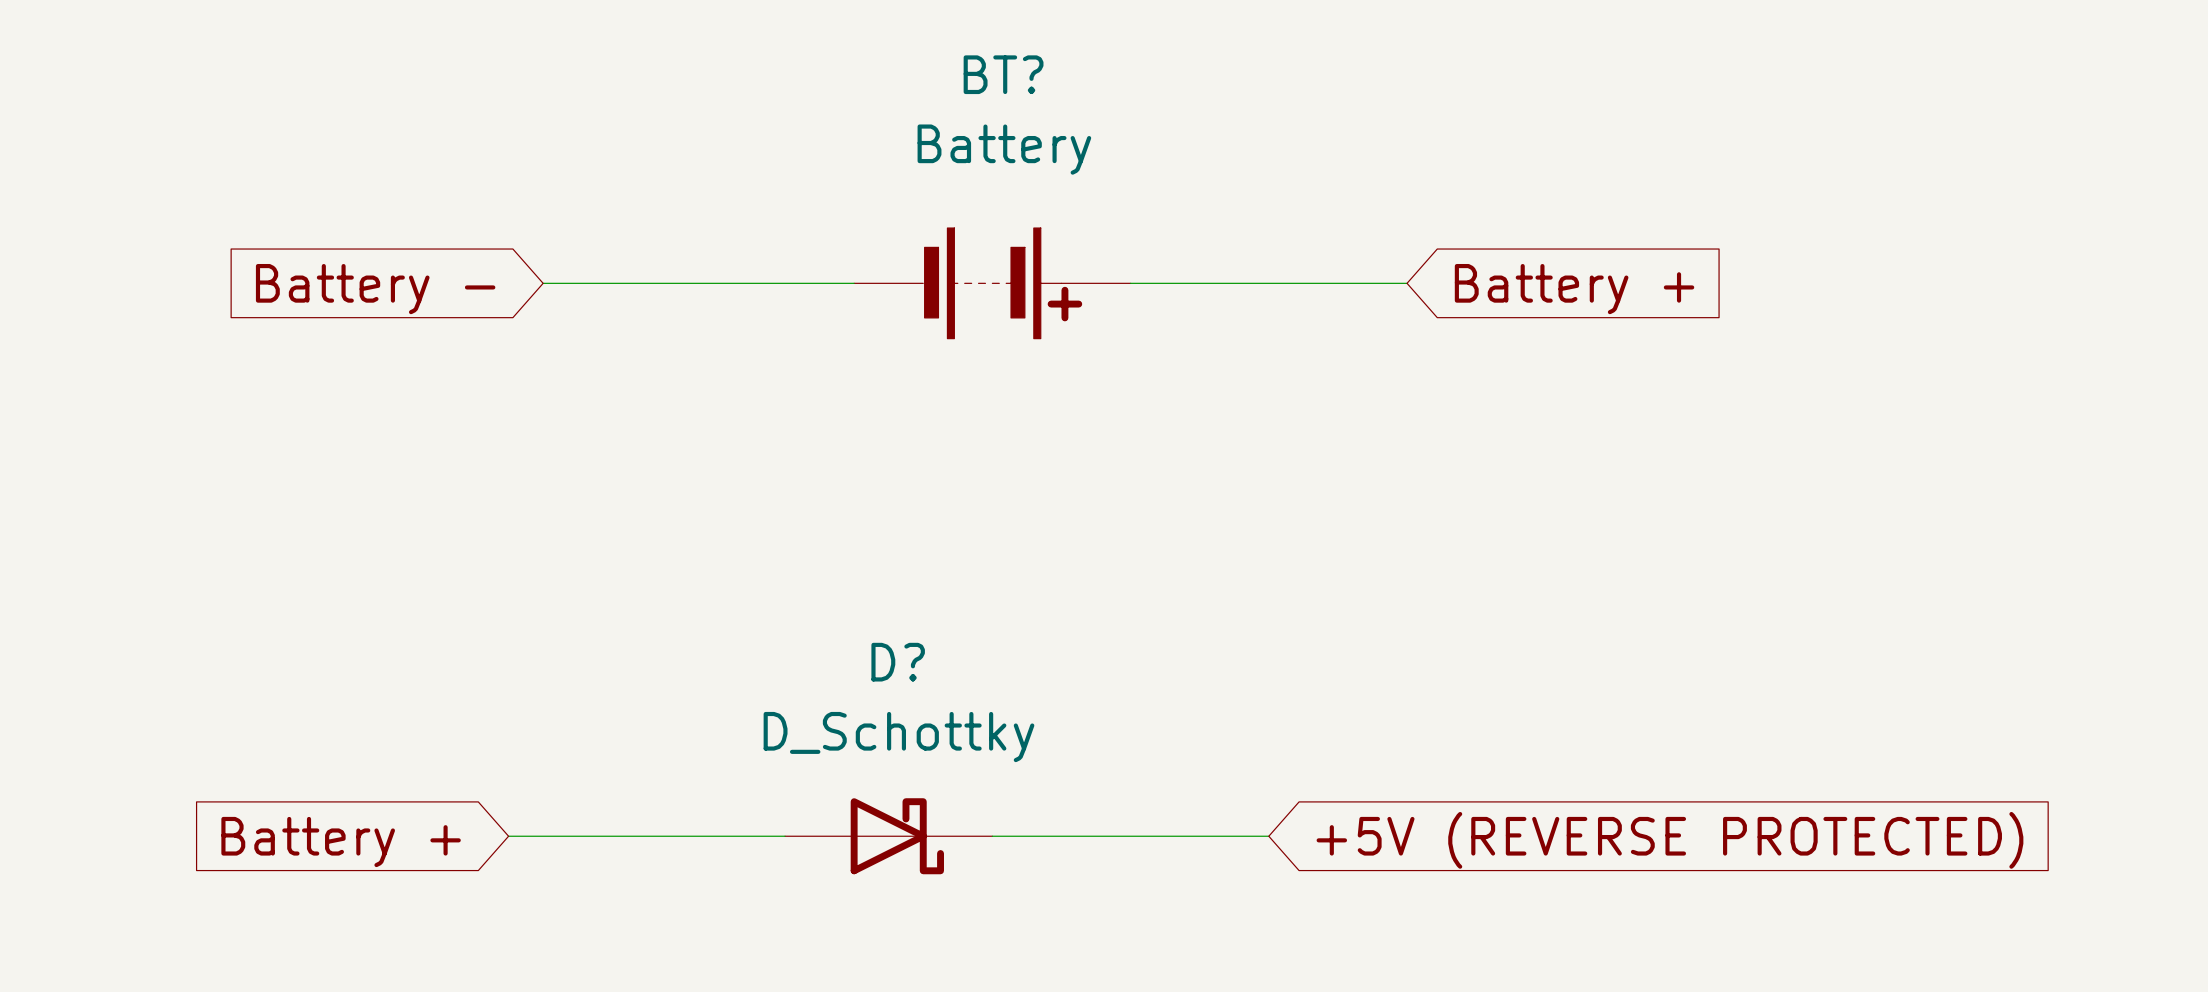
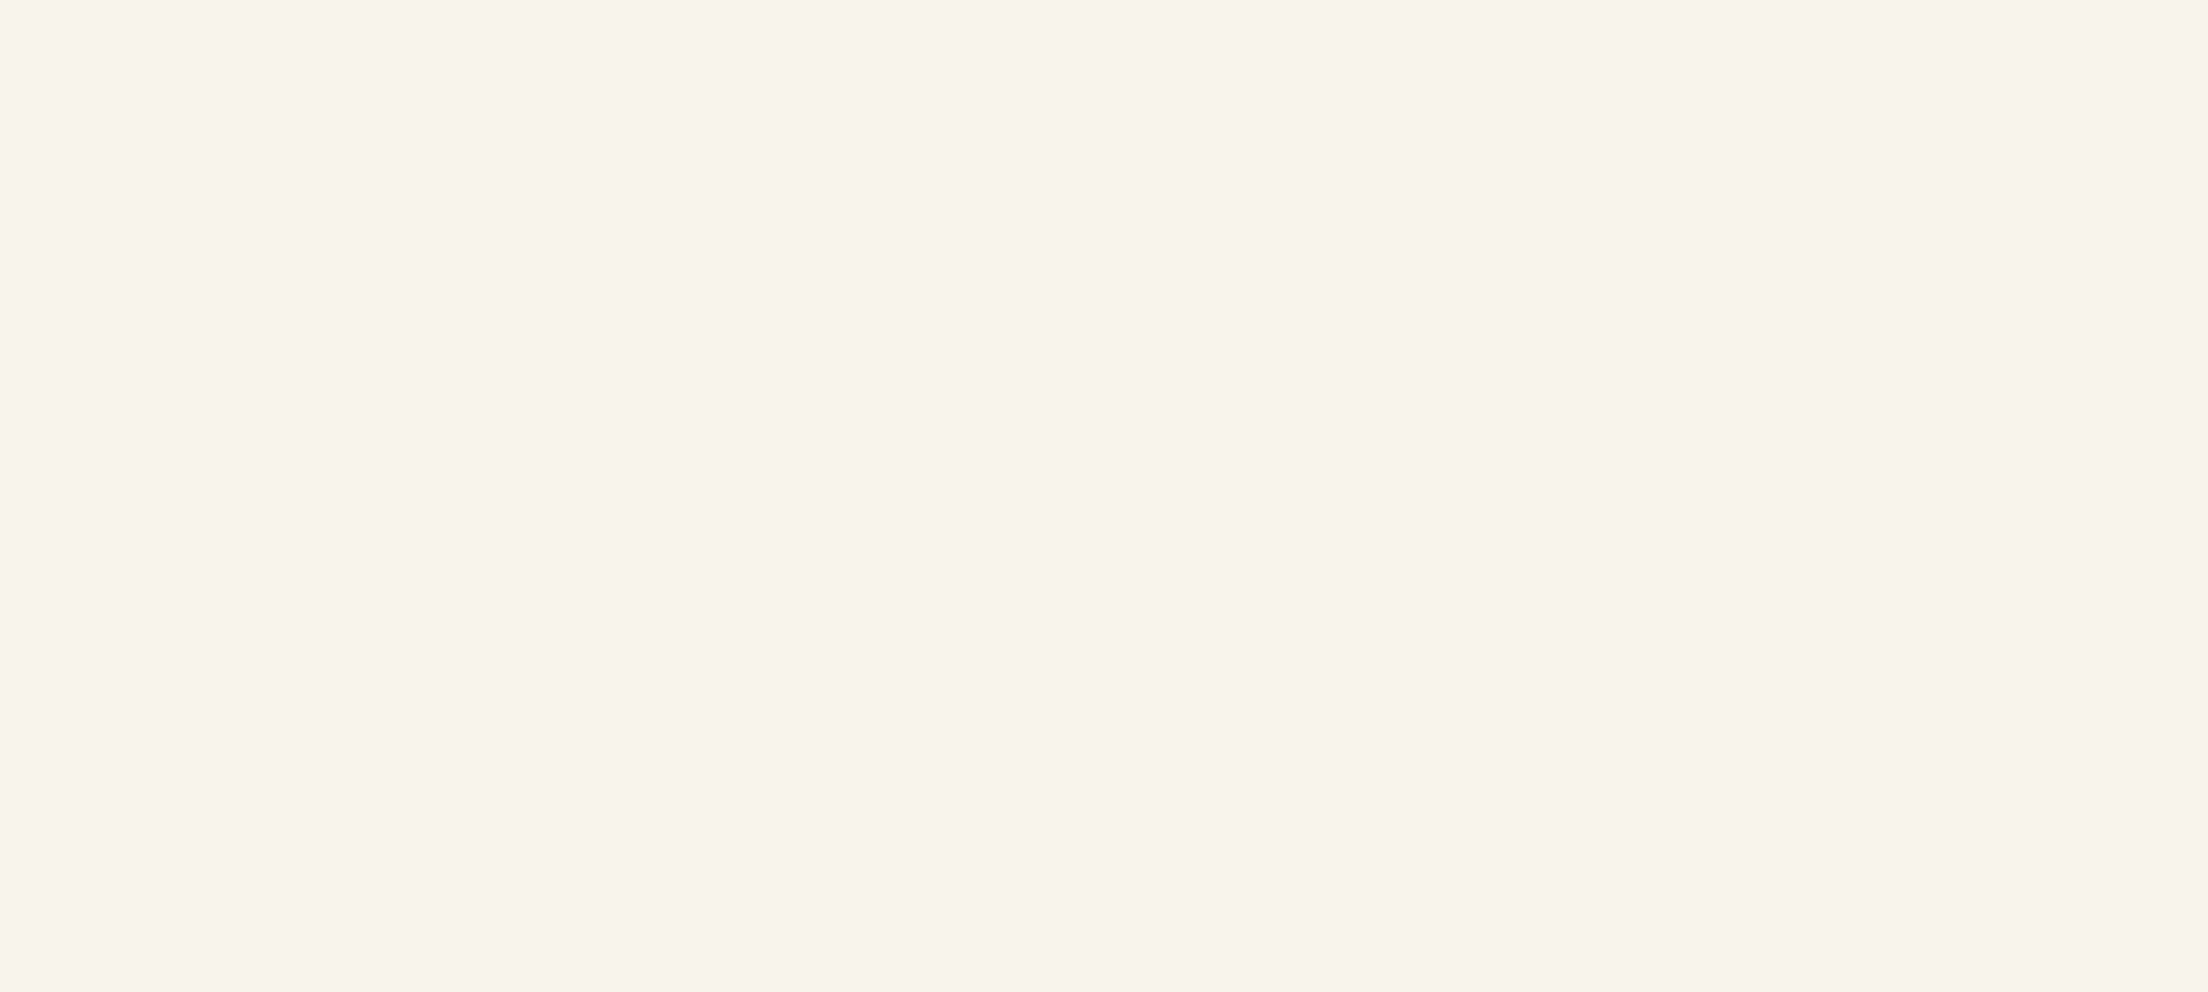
wire: (543, 283) (854, 283) -> none
BT?: Battery (992, 283) -> none
wire: (1130, 283) (1407, 283) -> none
global label: Battery - (375, 289) -> none
global label: Battery + (1574, 289) -> none
wire: (508, 836) (785, 836) -> none
D?: D_Schottky (888, 836) -> none
wire: (992, 836) (1268, 836) -> none
global label: +5V (REVERSE PROTECTED) (1669, 840) -> none
global label: Battery + (341, 842) -> none

